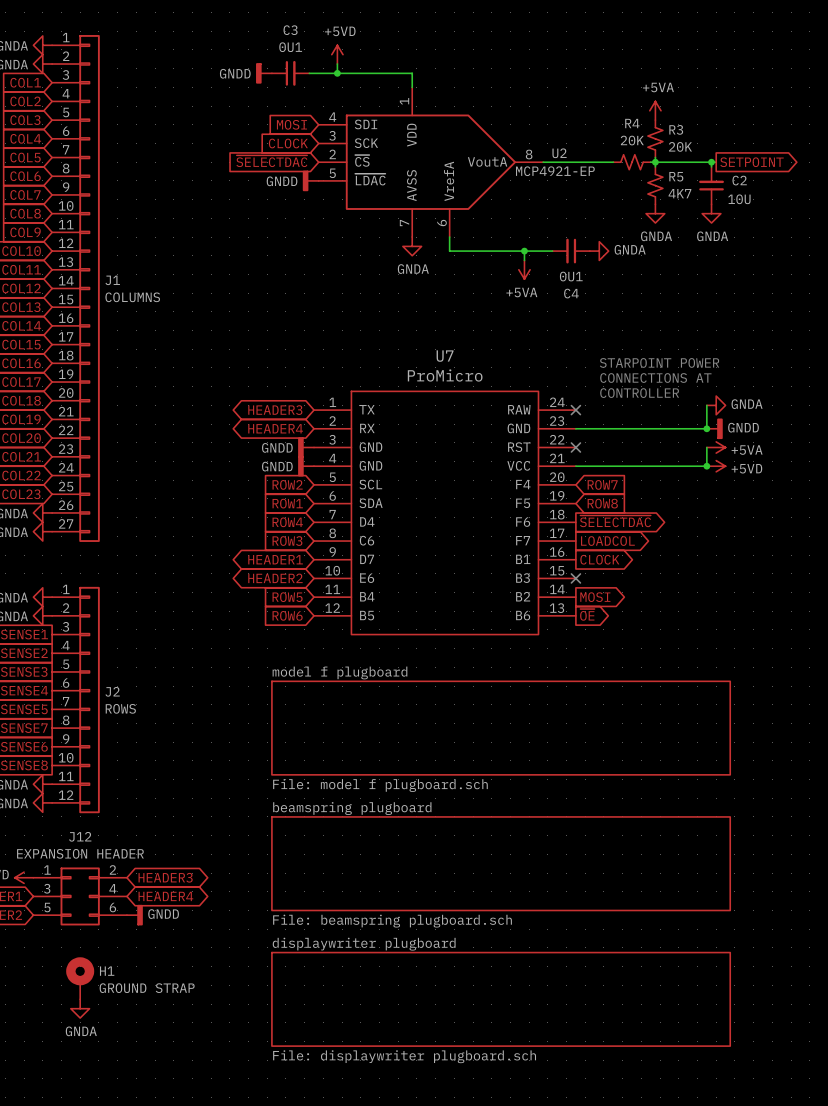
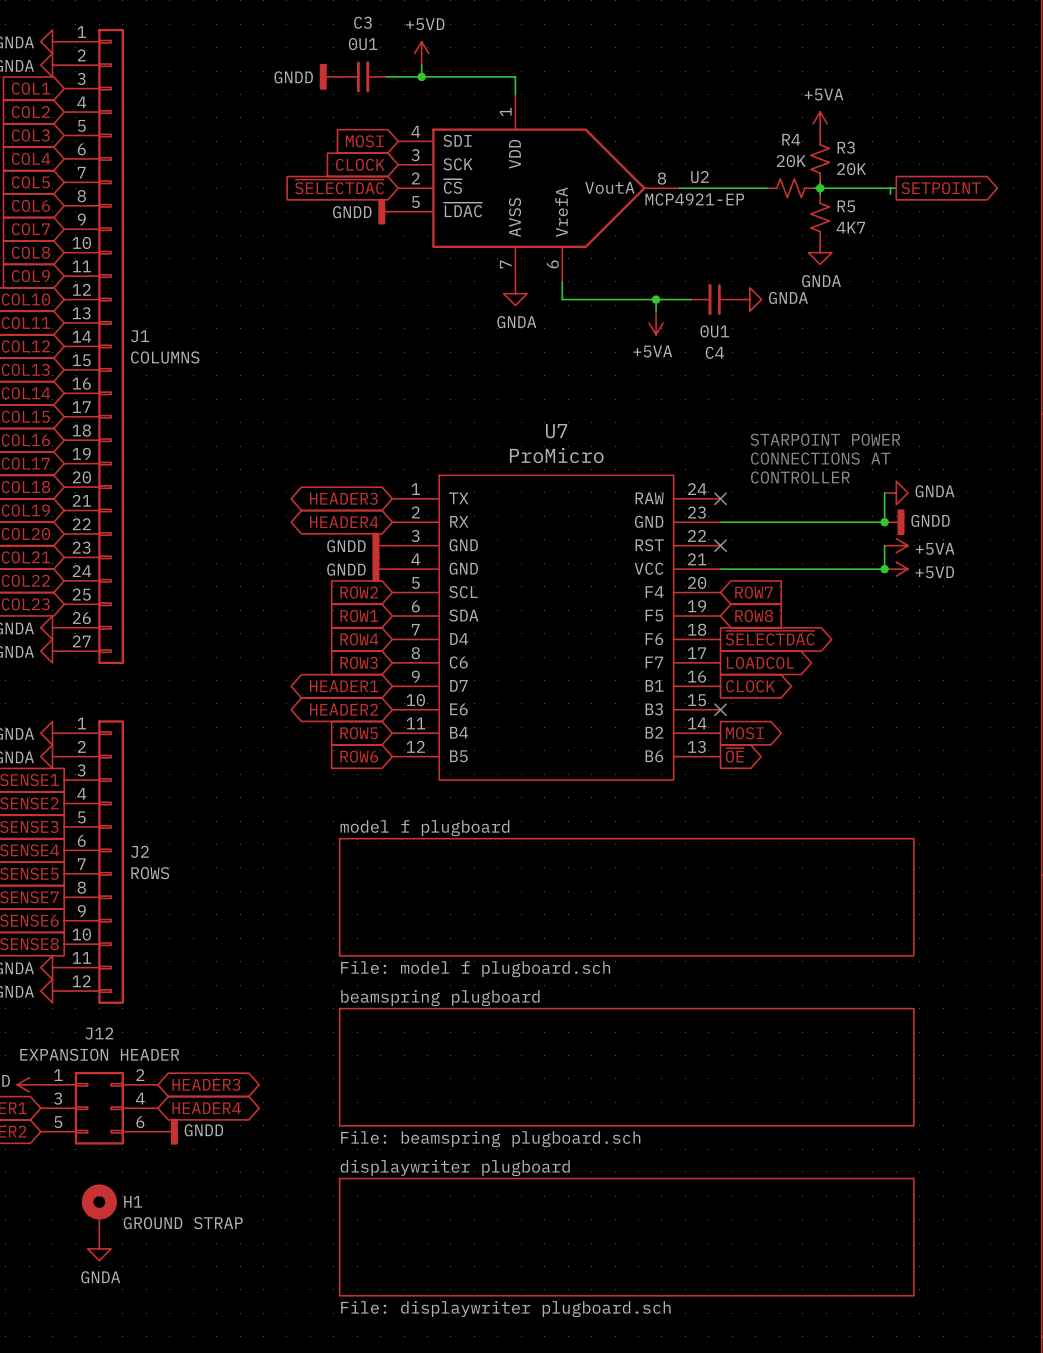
junction: (711, 162) -> none
C2: 10U (711, 185) -> none
power symbol: GNDA (711, 213) -> none

